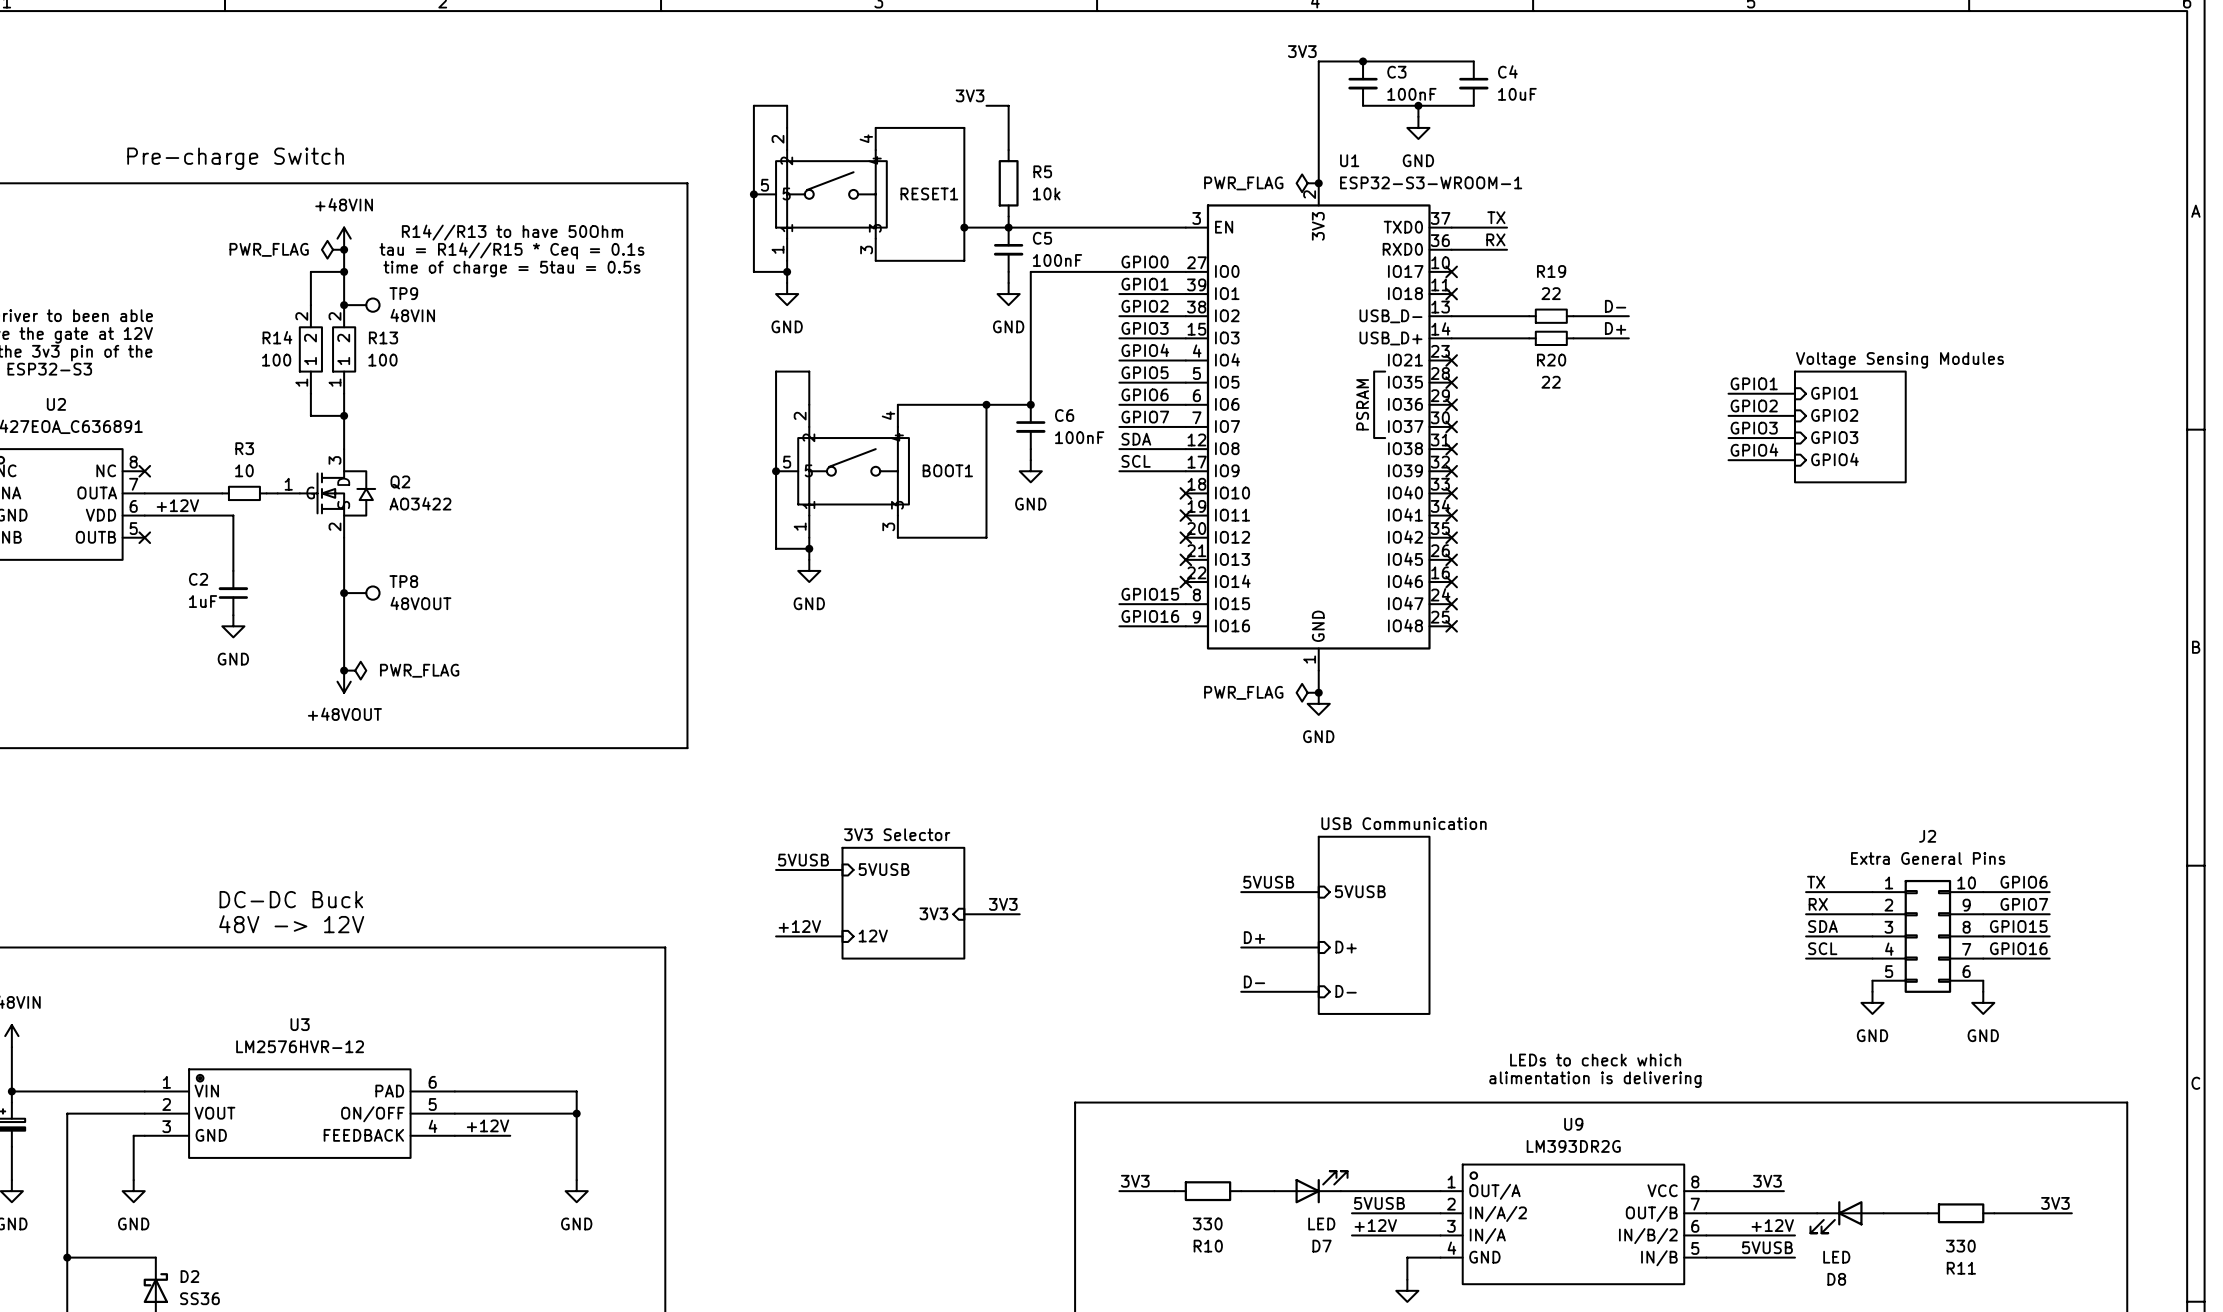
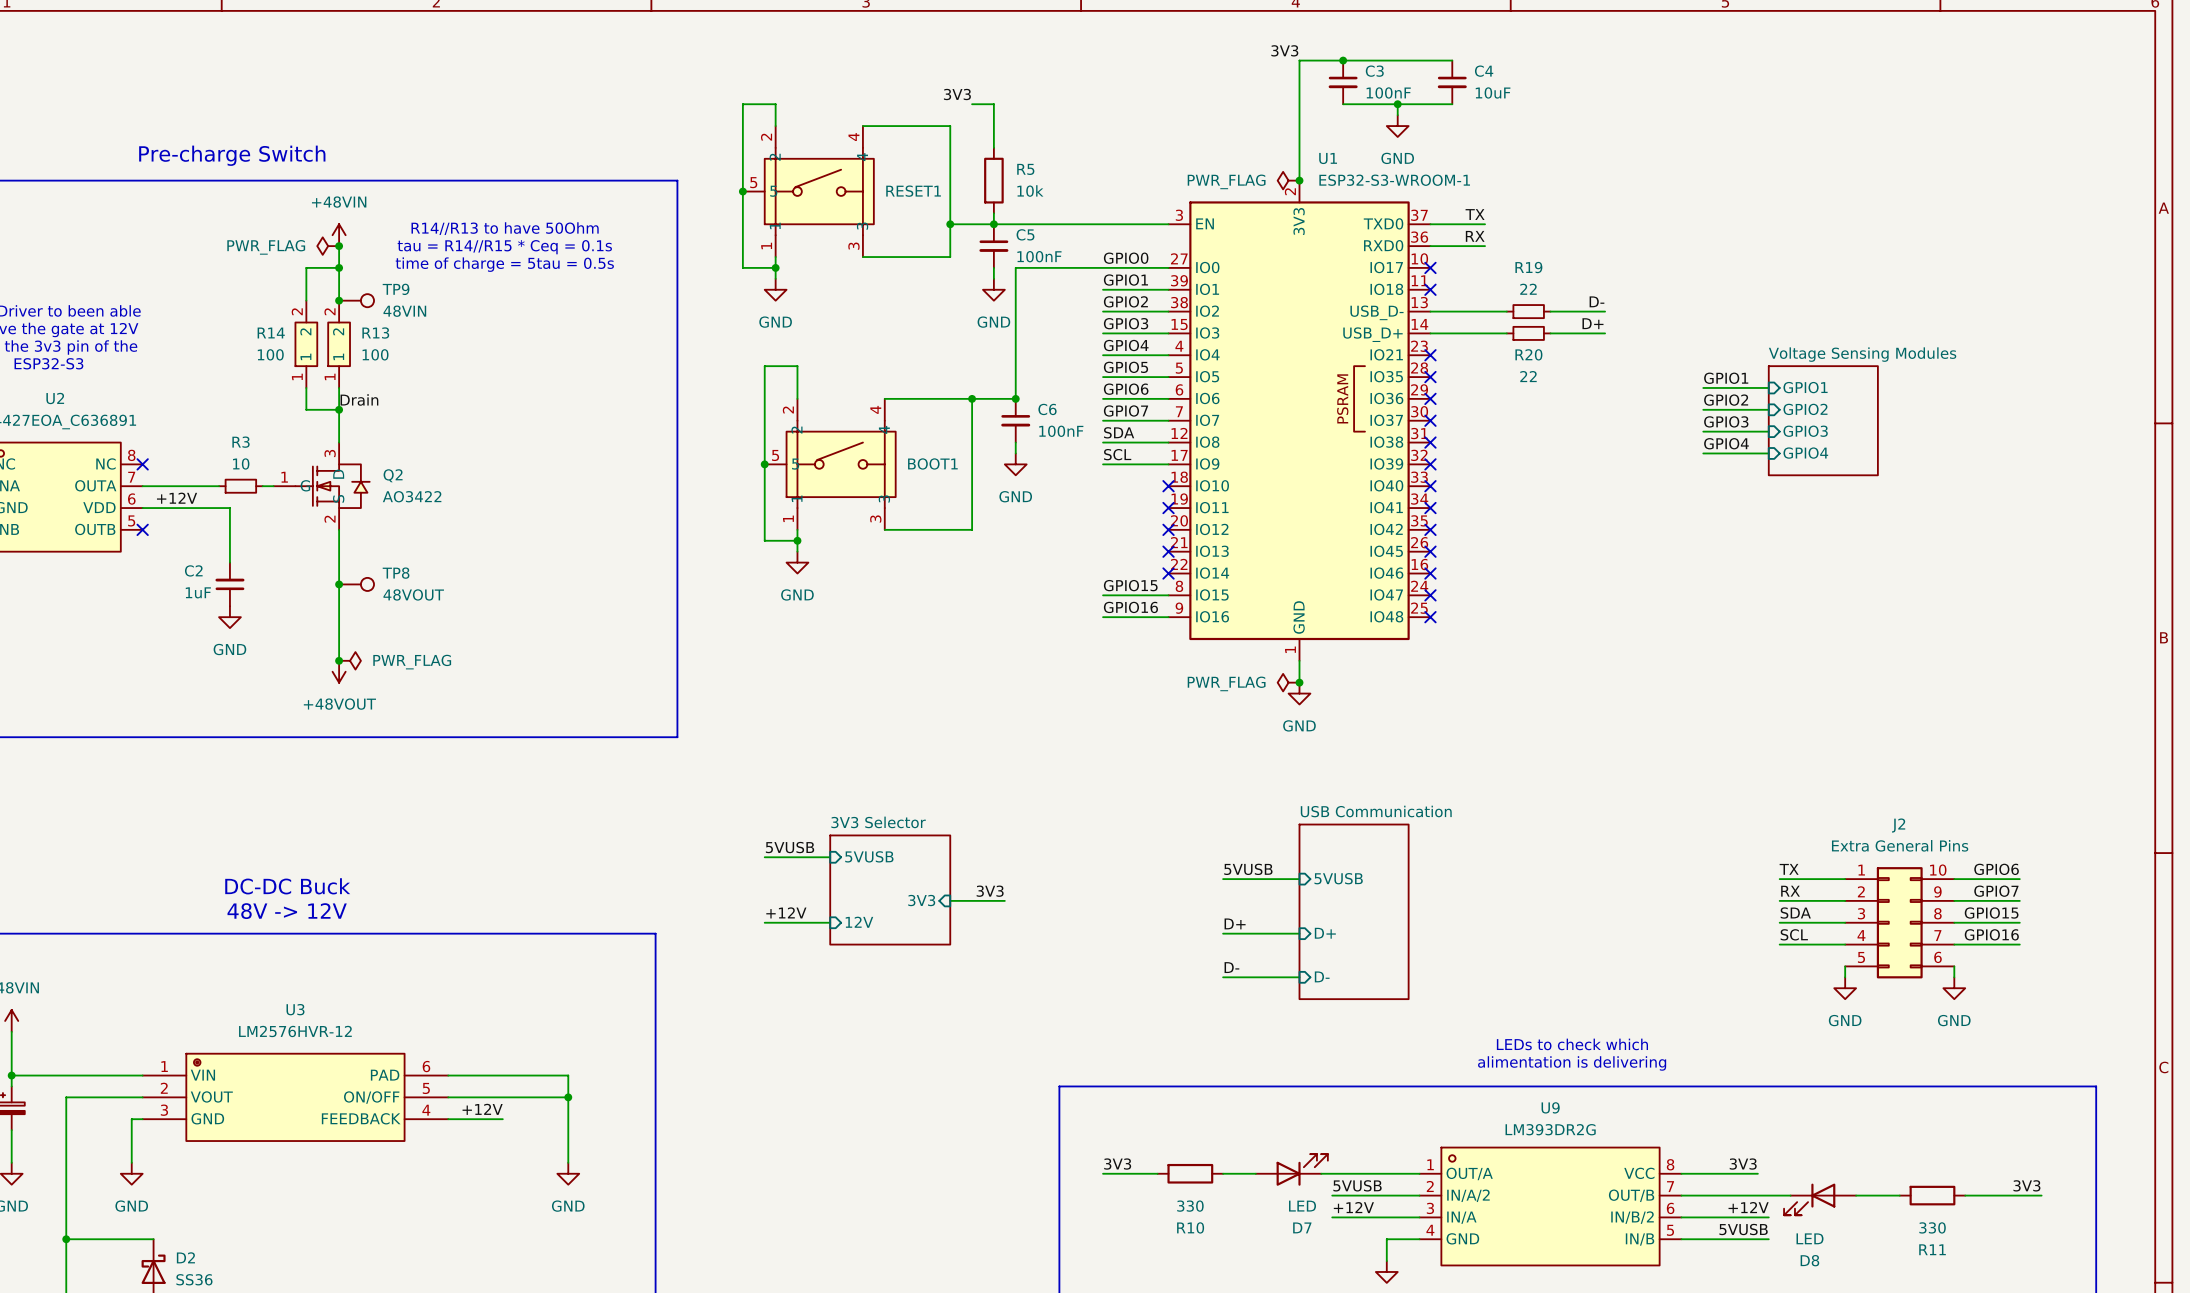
label: none -> Drain (359, 399)

